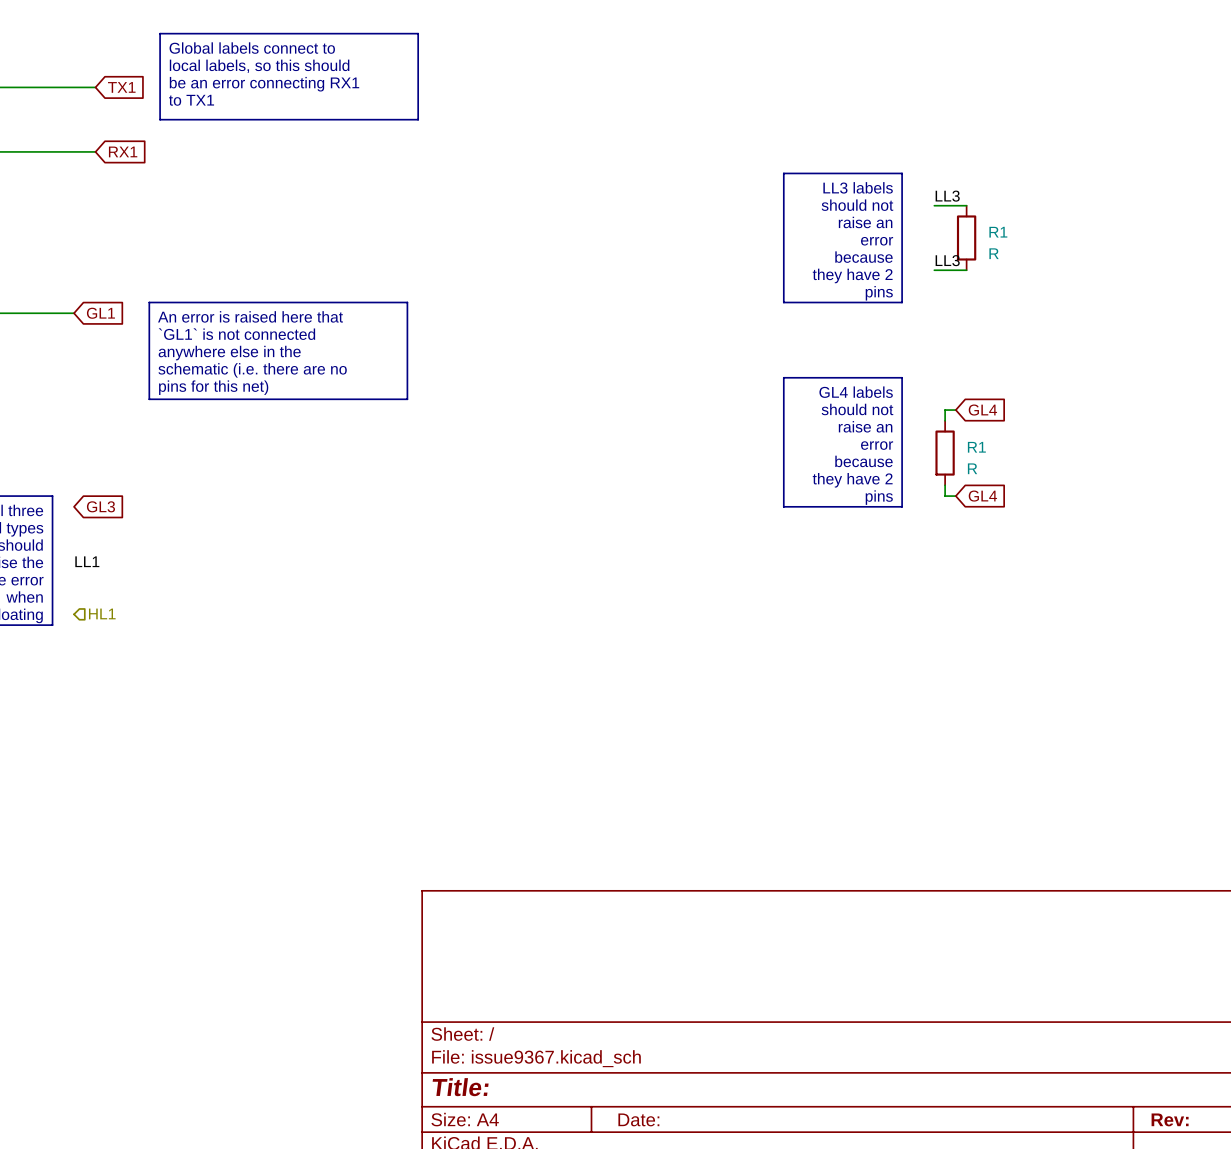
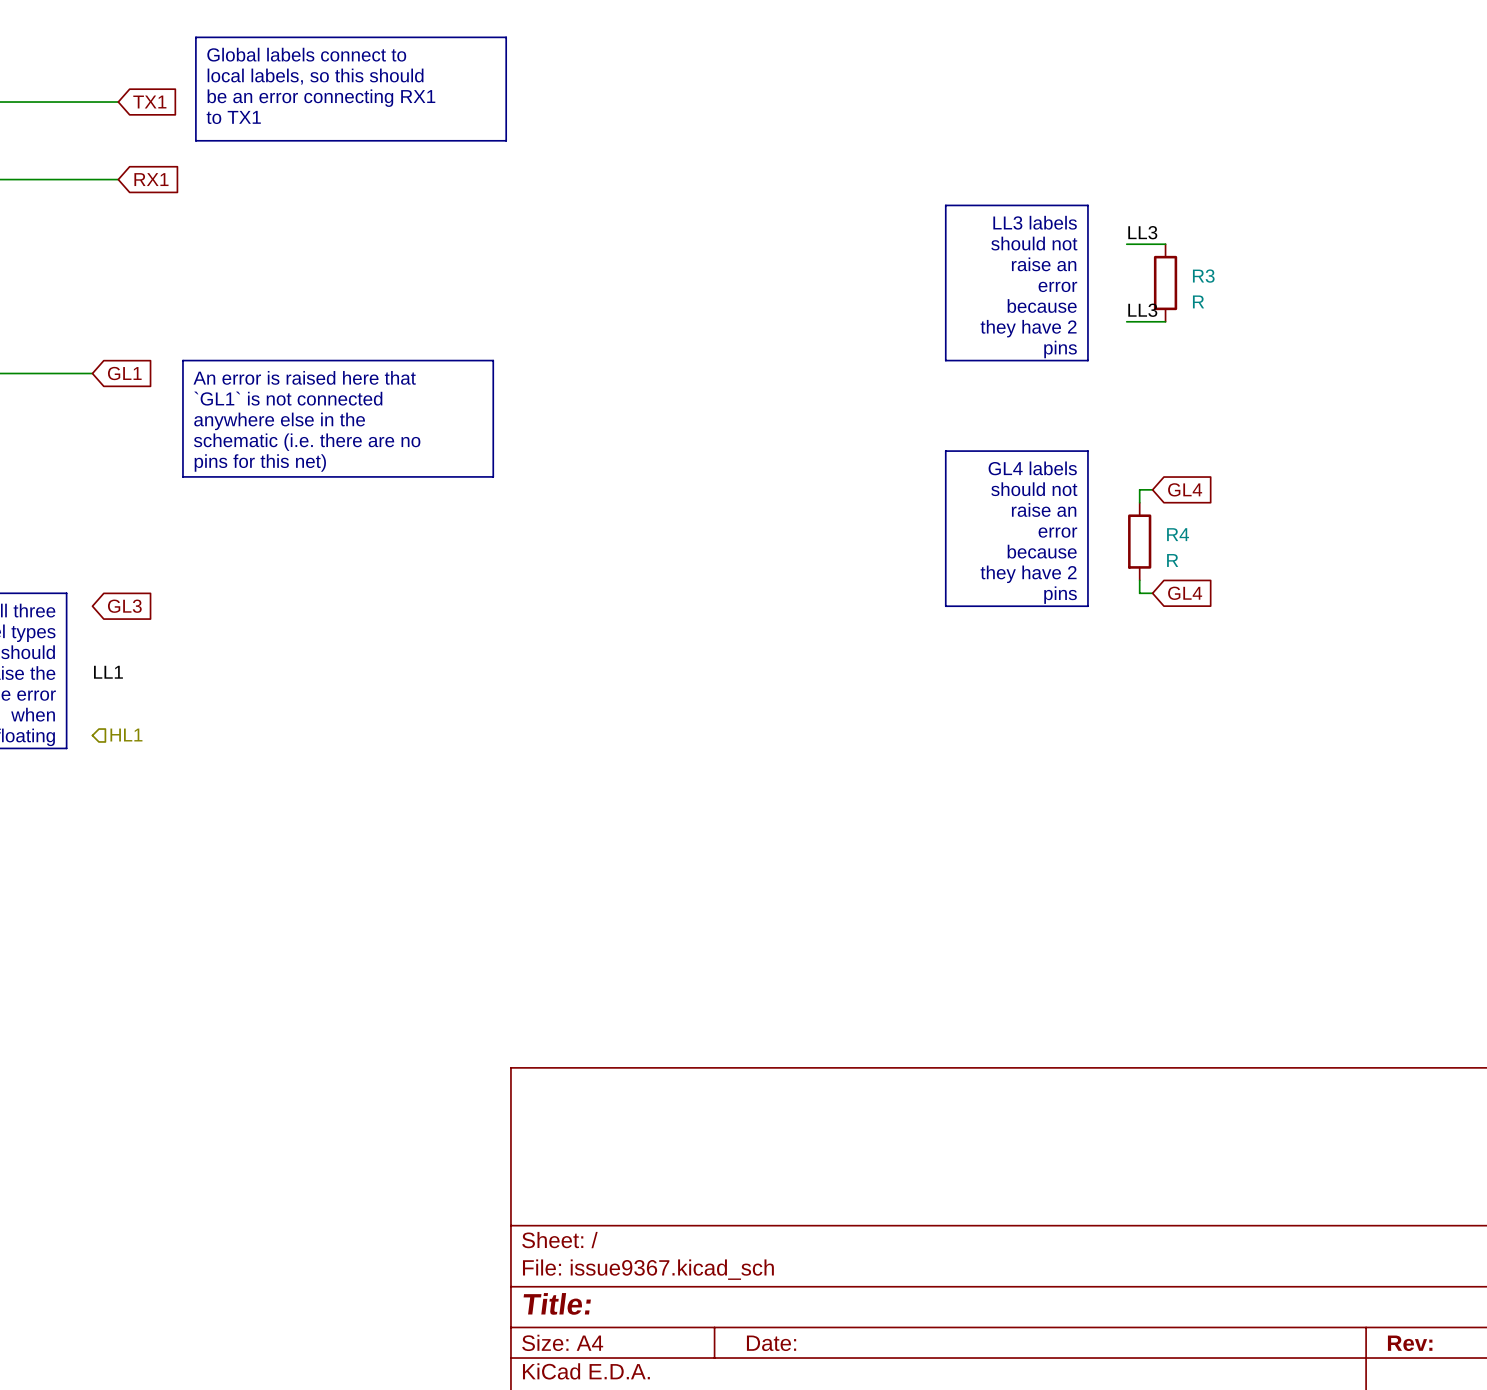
R1 name: R1 (998, 232) -> R3 (1203, 276)
R1 name: R1 (976, 447) -> R4 (1178, 534)

